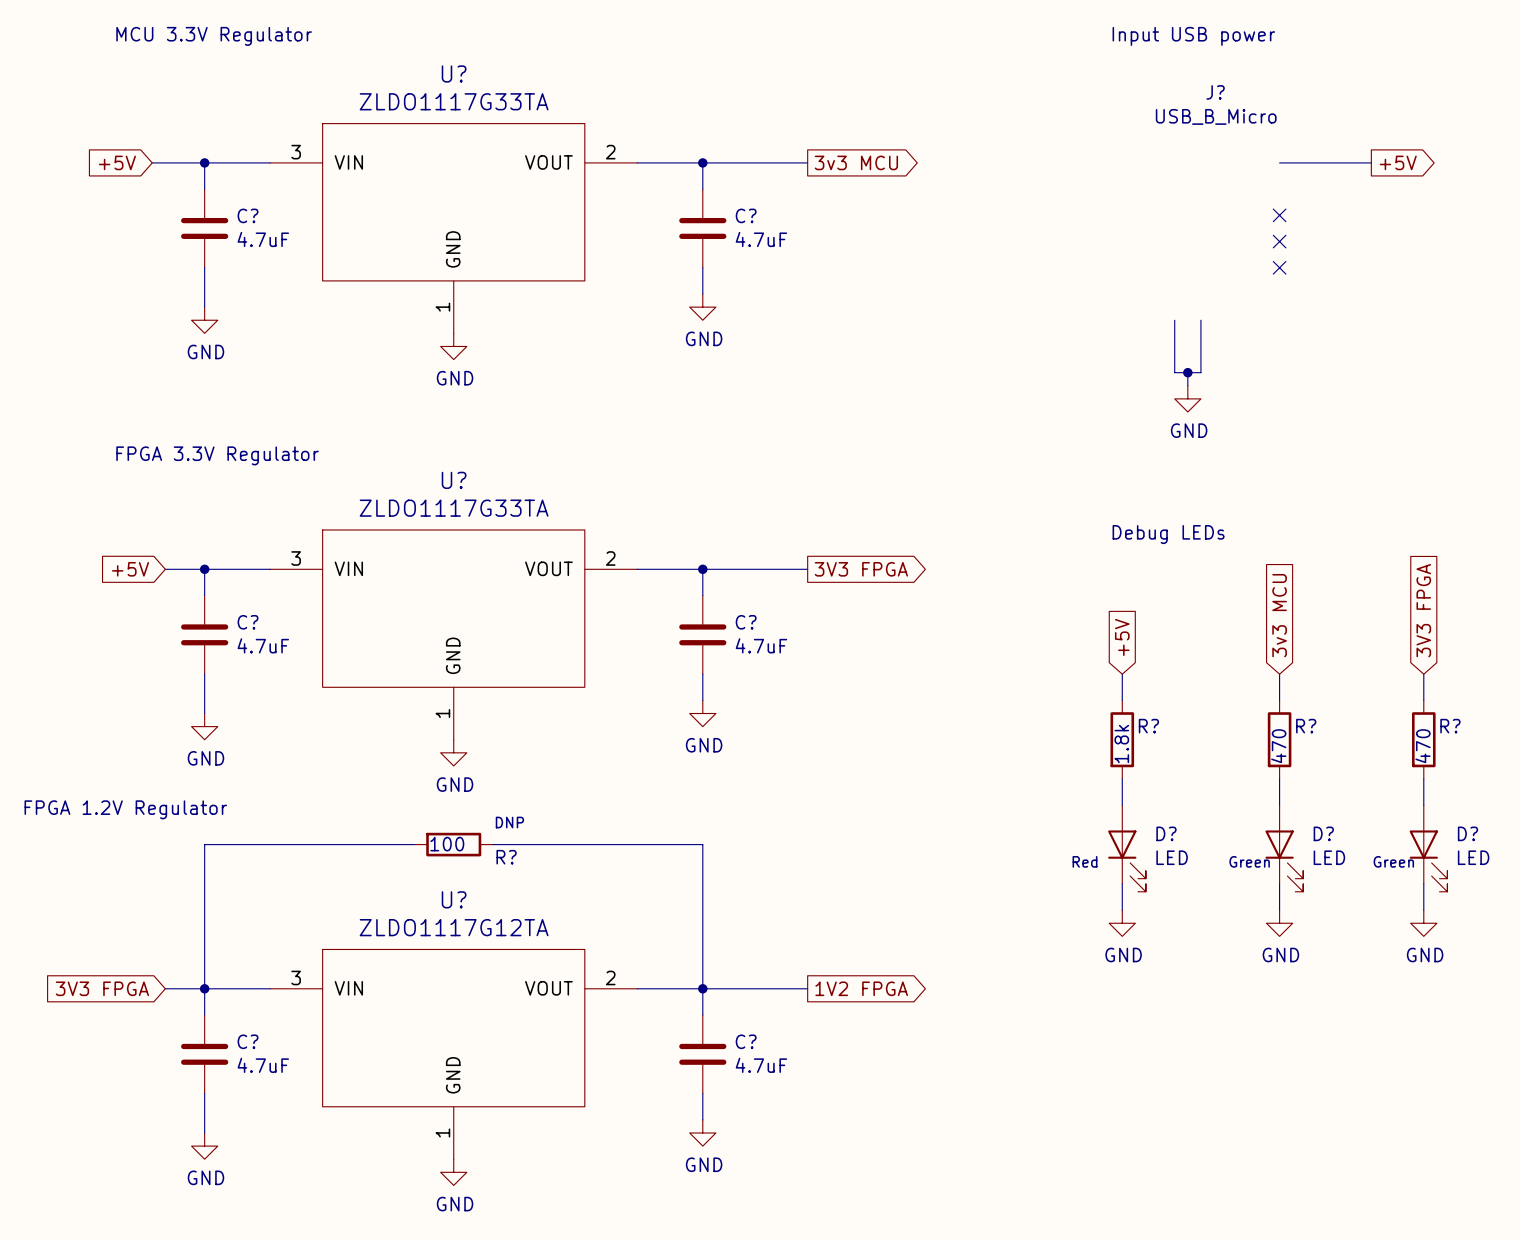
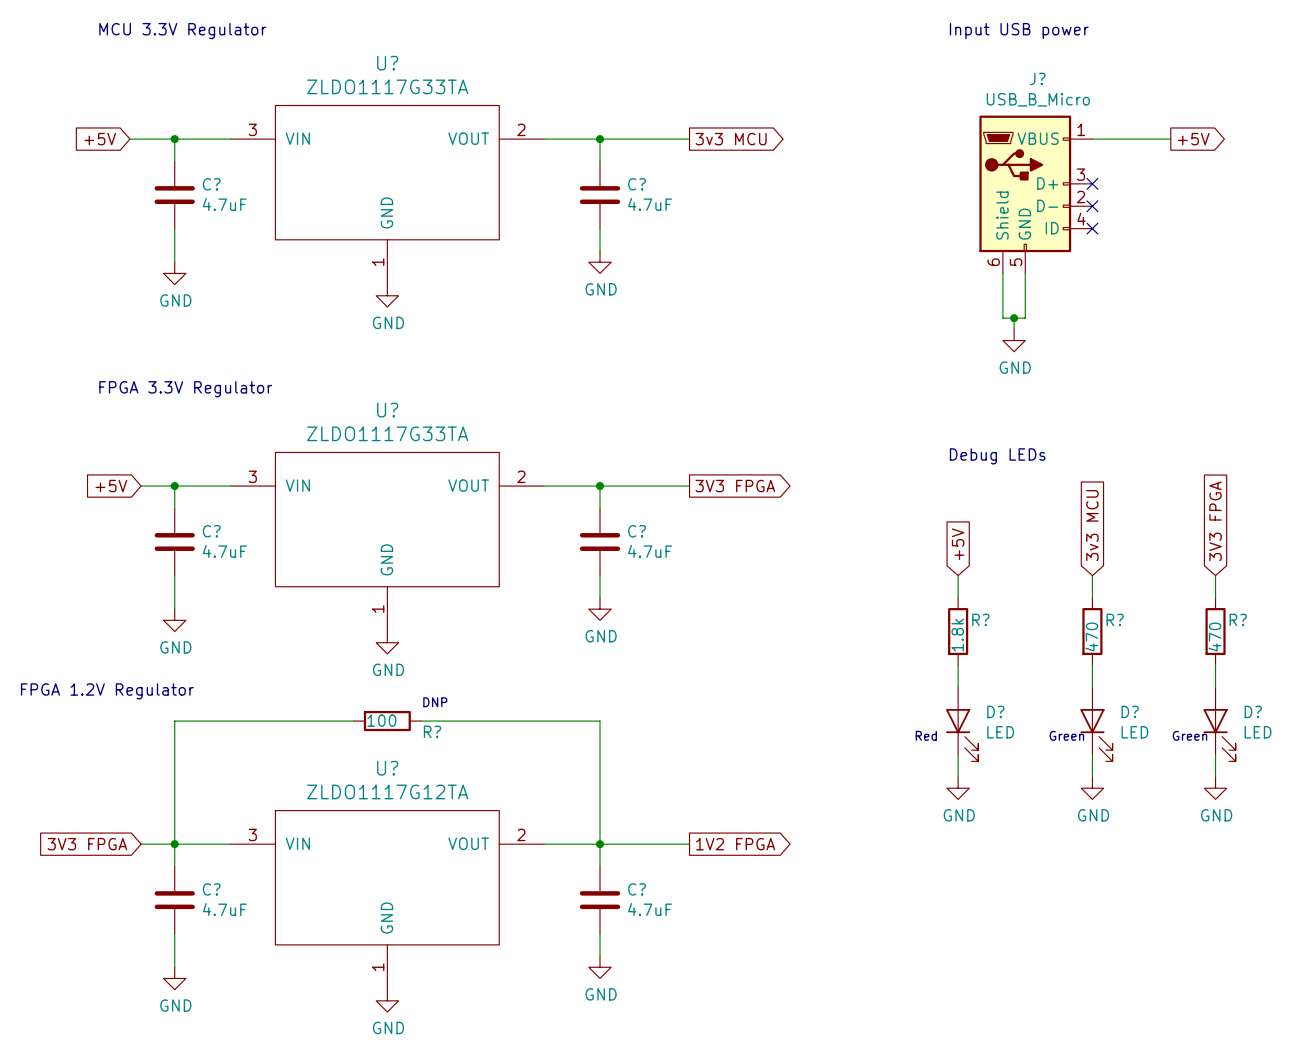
J?: none -> USB_B_Micro (1035, 194)

